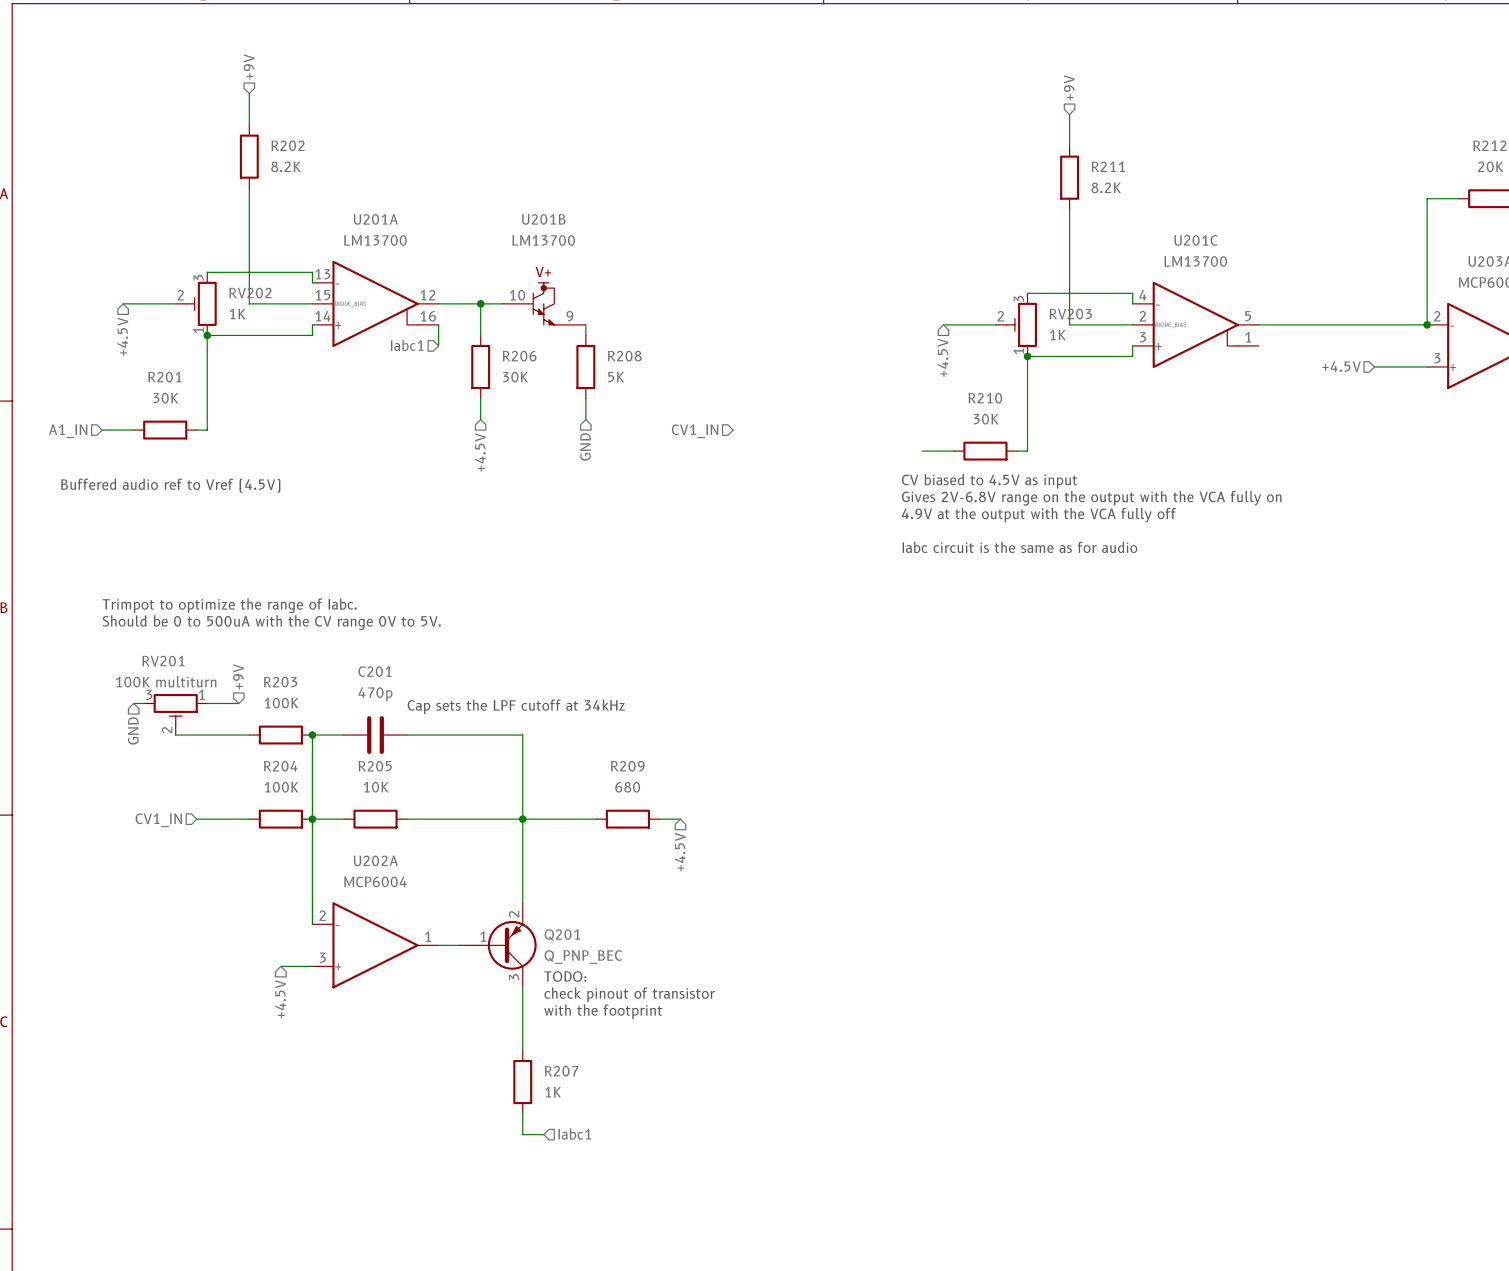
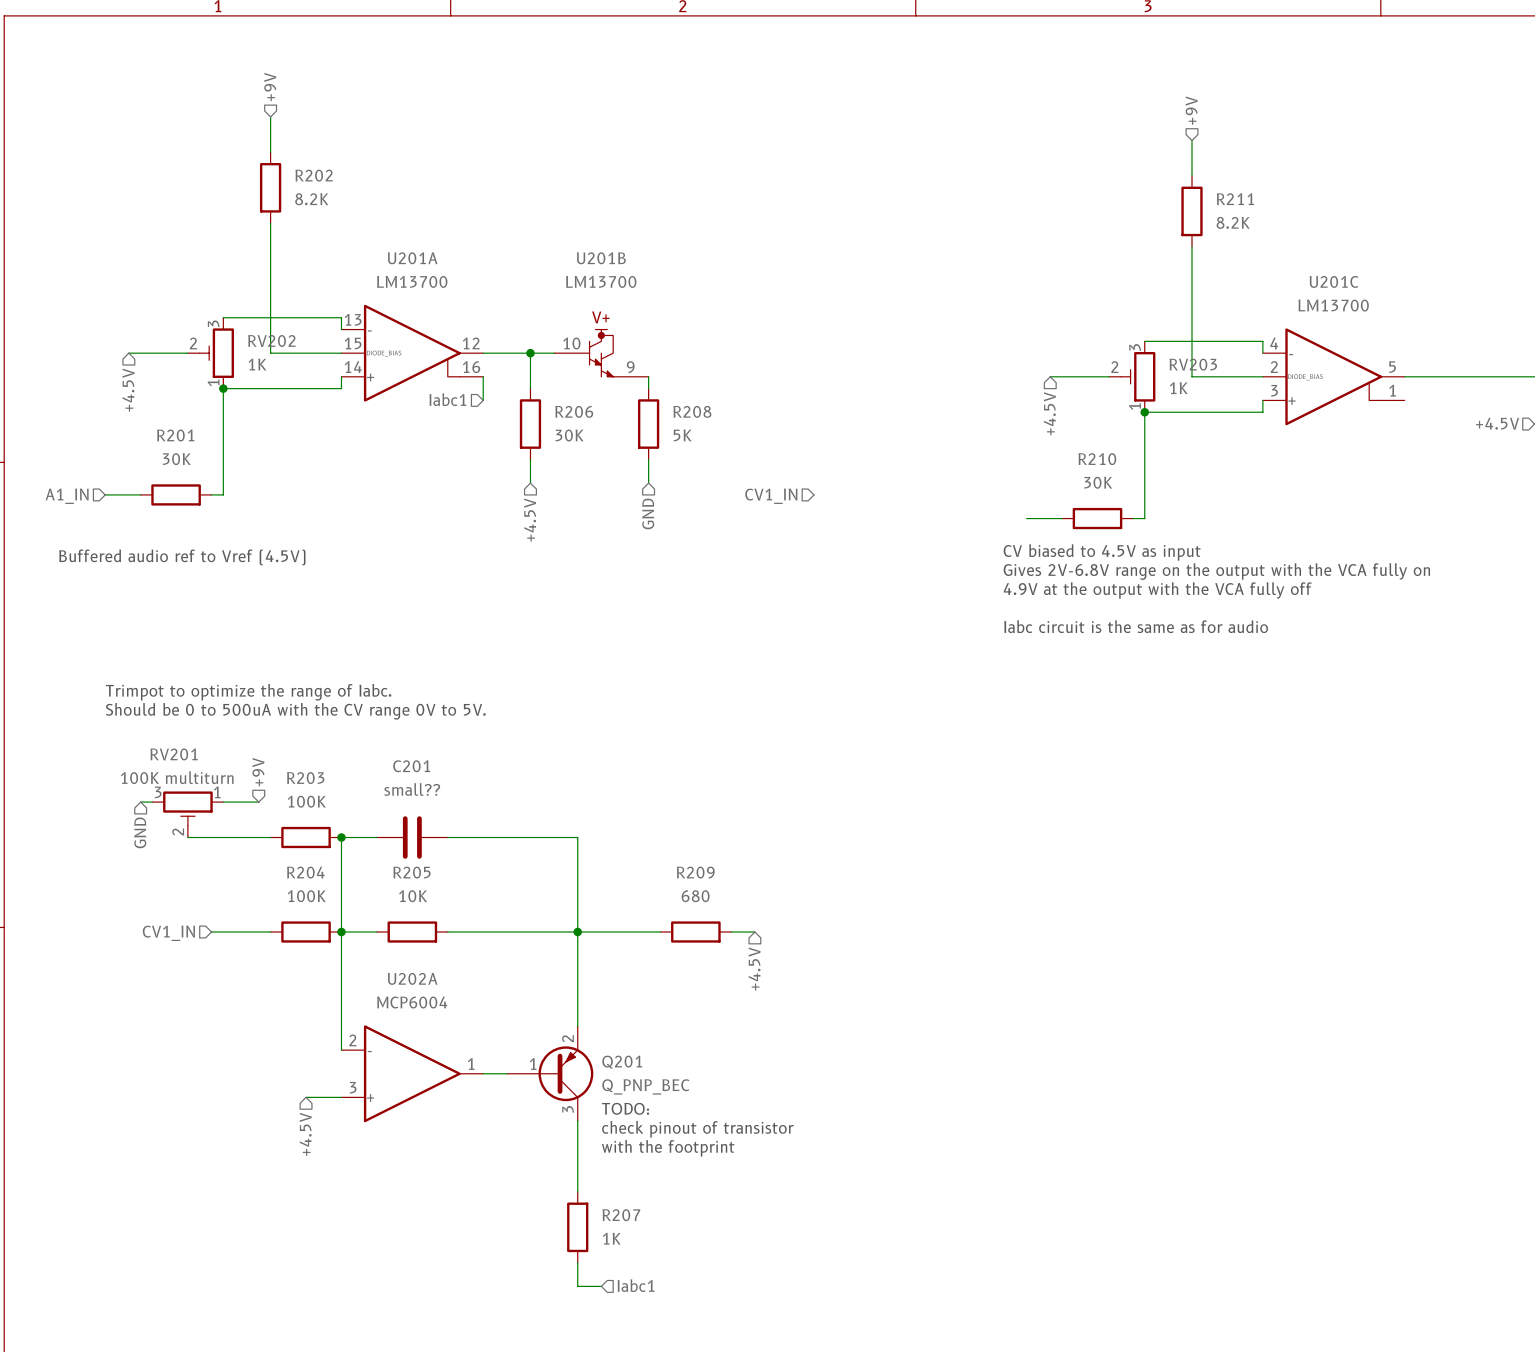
C201 value: 470p (375, 694) -> small?? (412, 789)
text: Cap sets the LPF cutoff at 34kHz (516, 706) -> none

